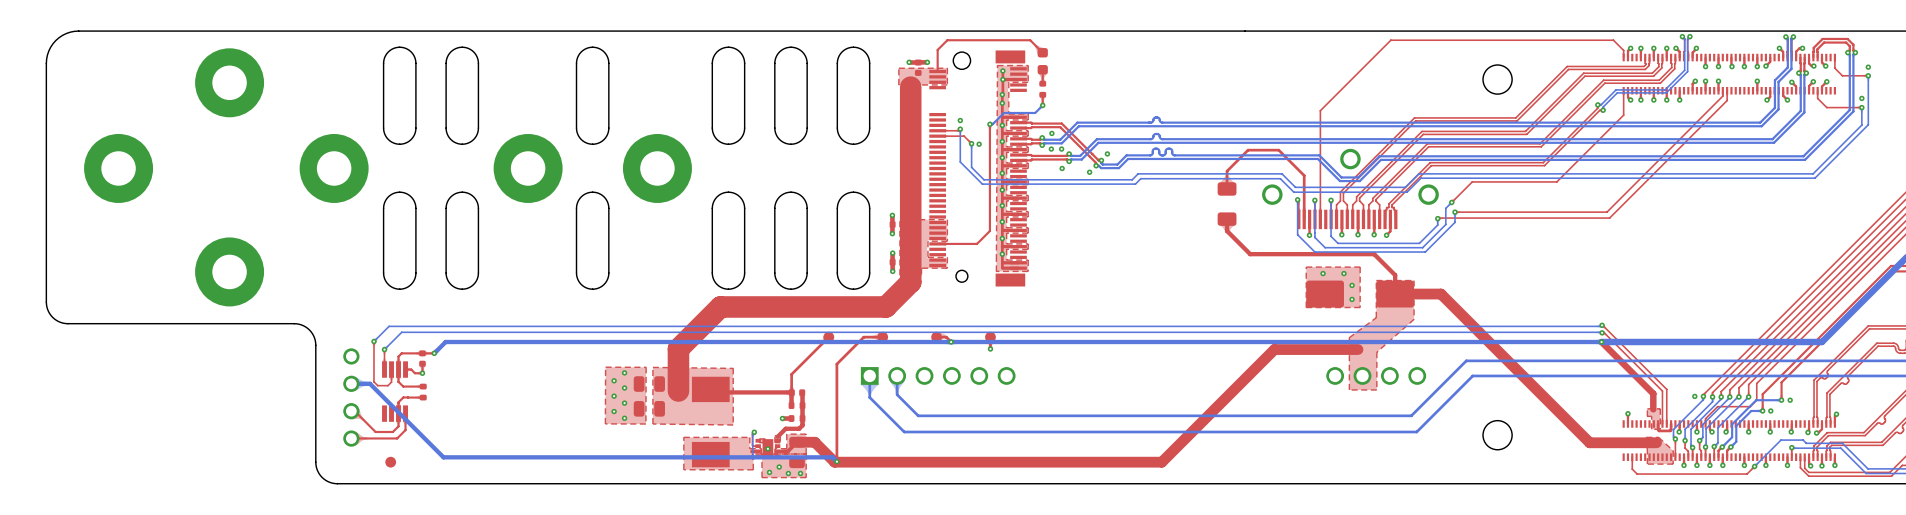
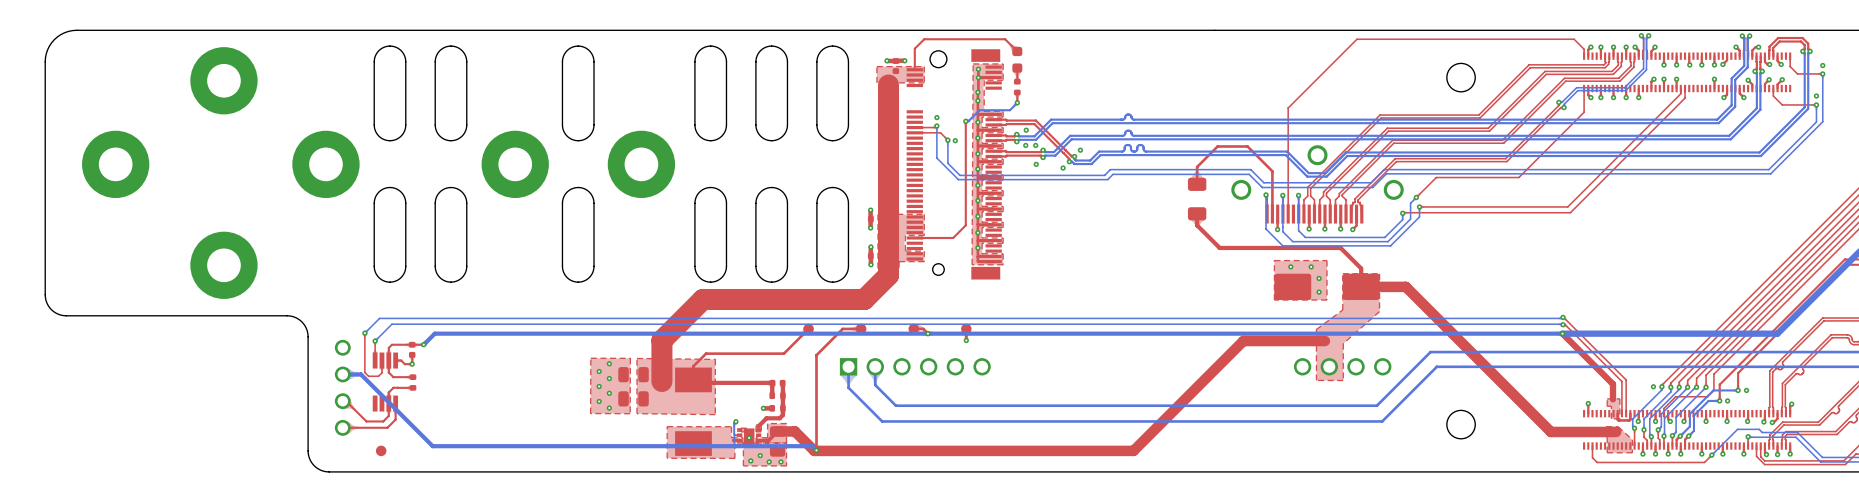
top track: (803, 362) (791, 374) (791, 392) -> (783, 353) (706, 353) (693, 366) (693, 379)

